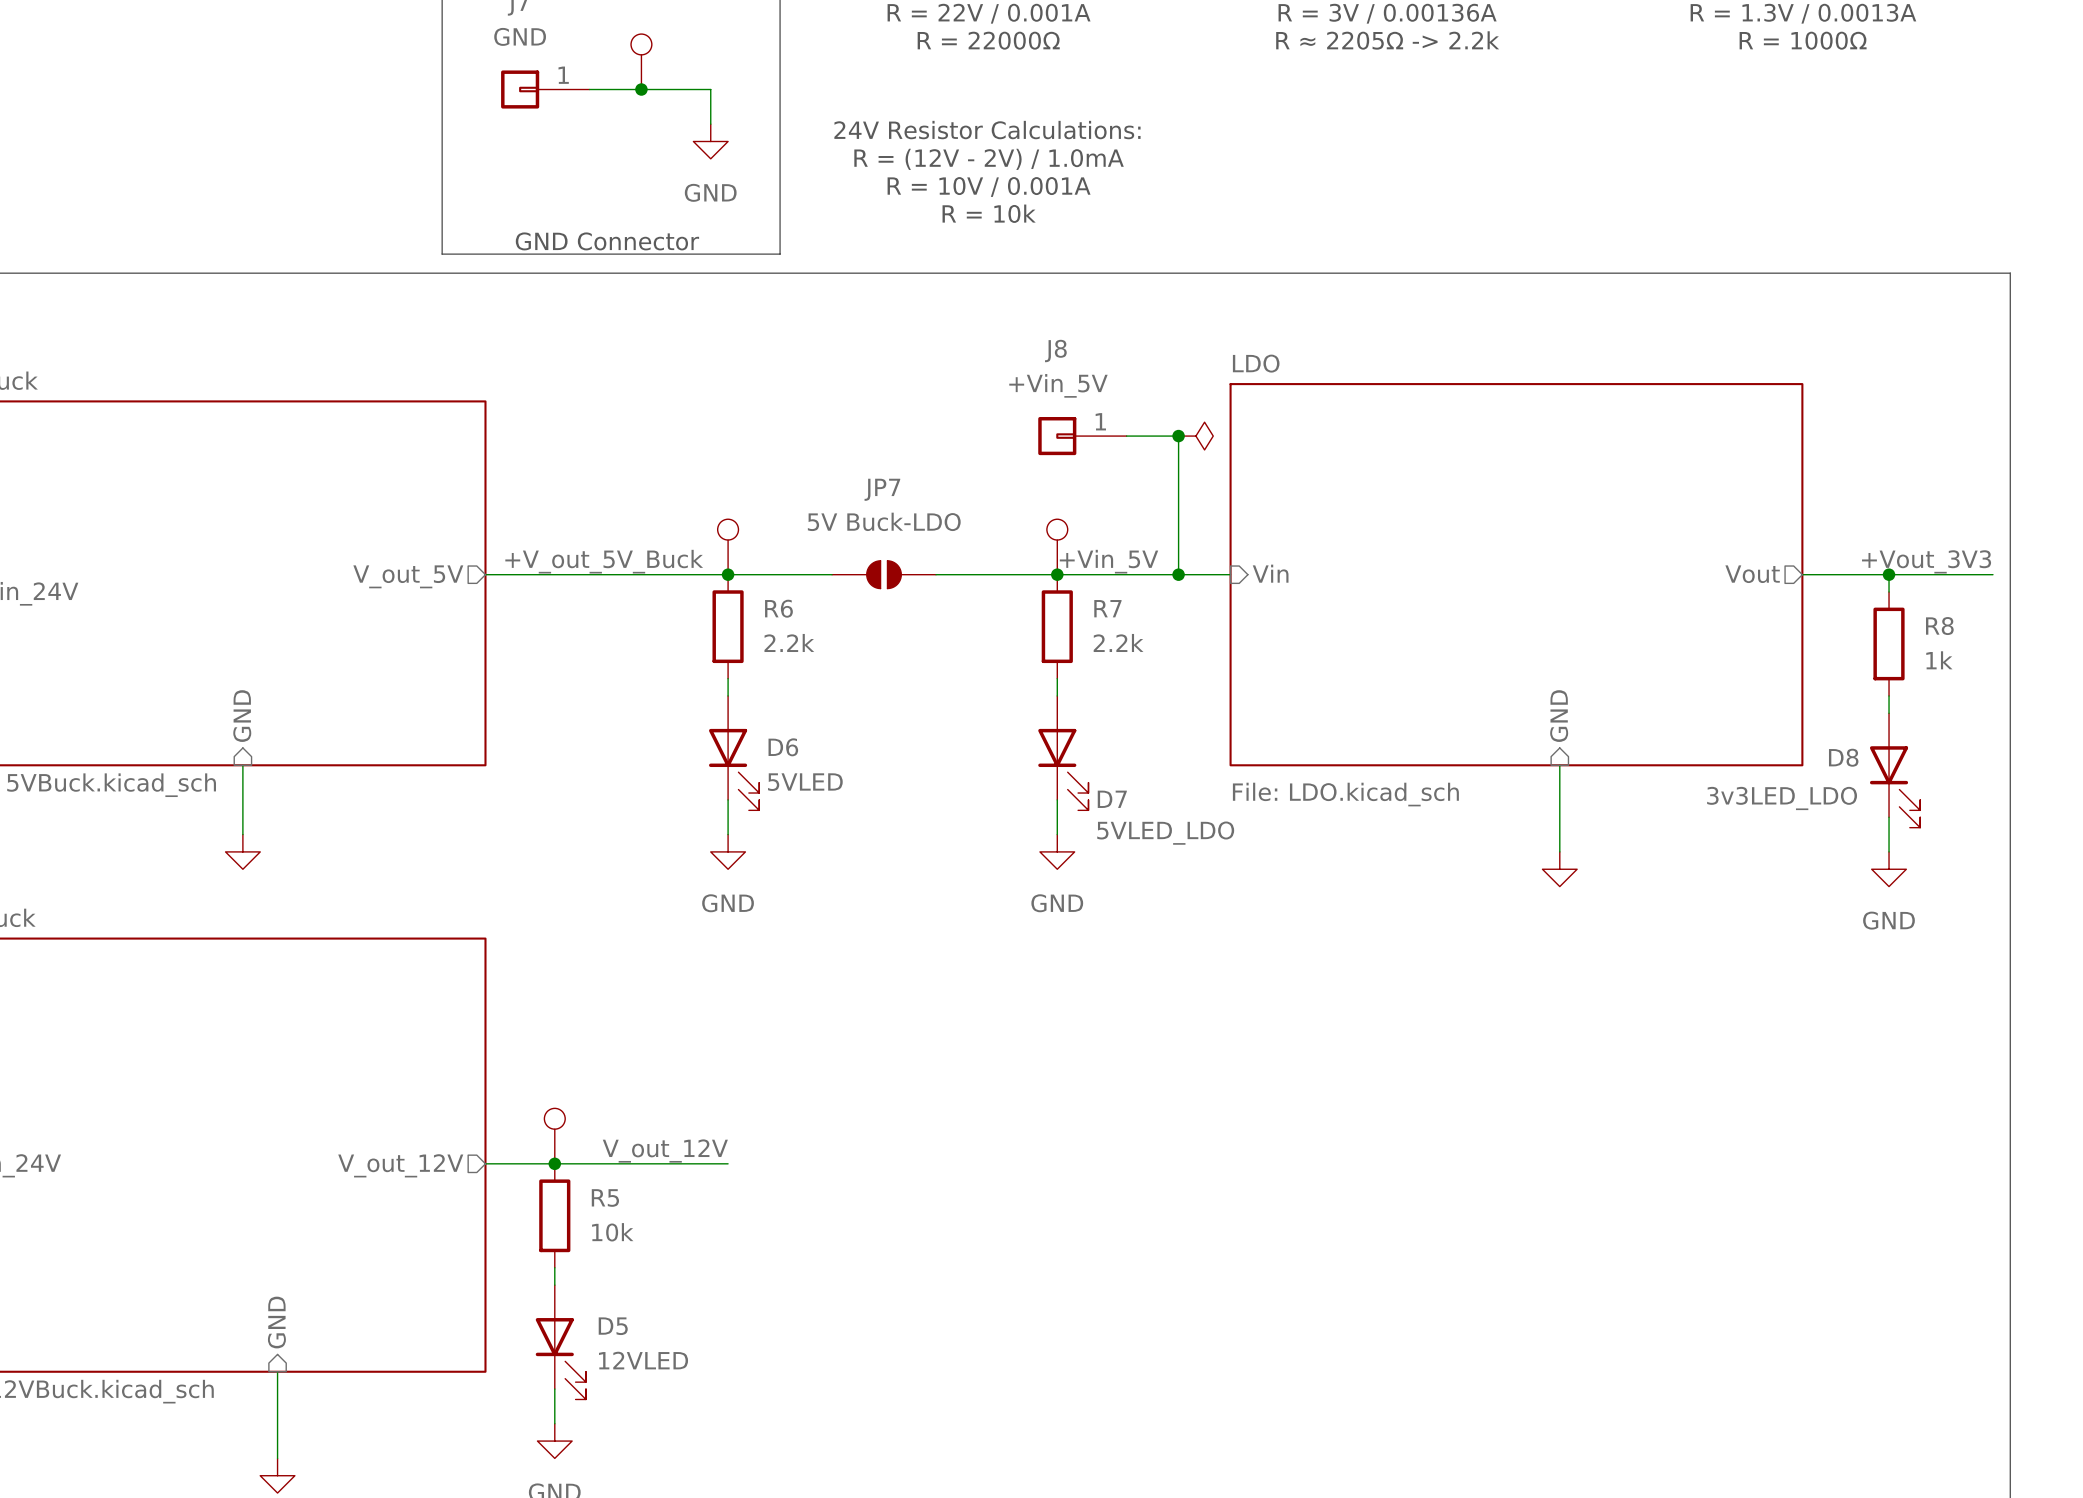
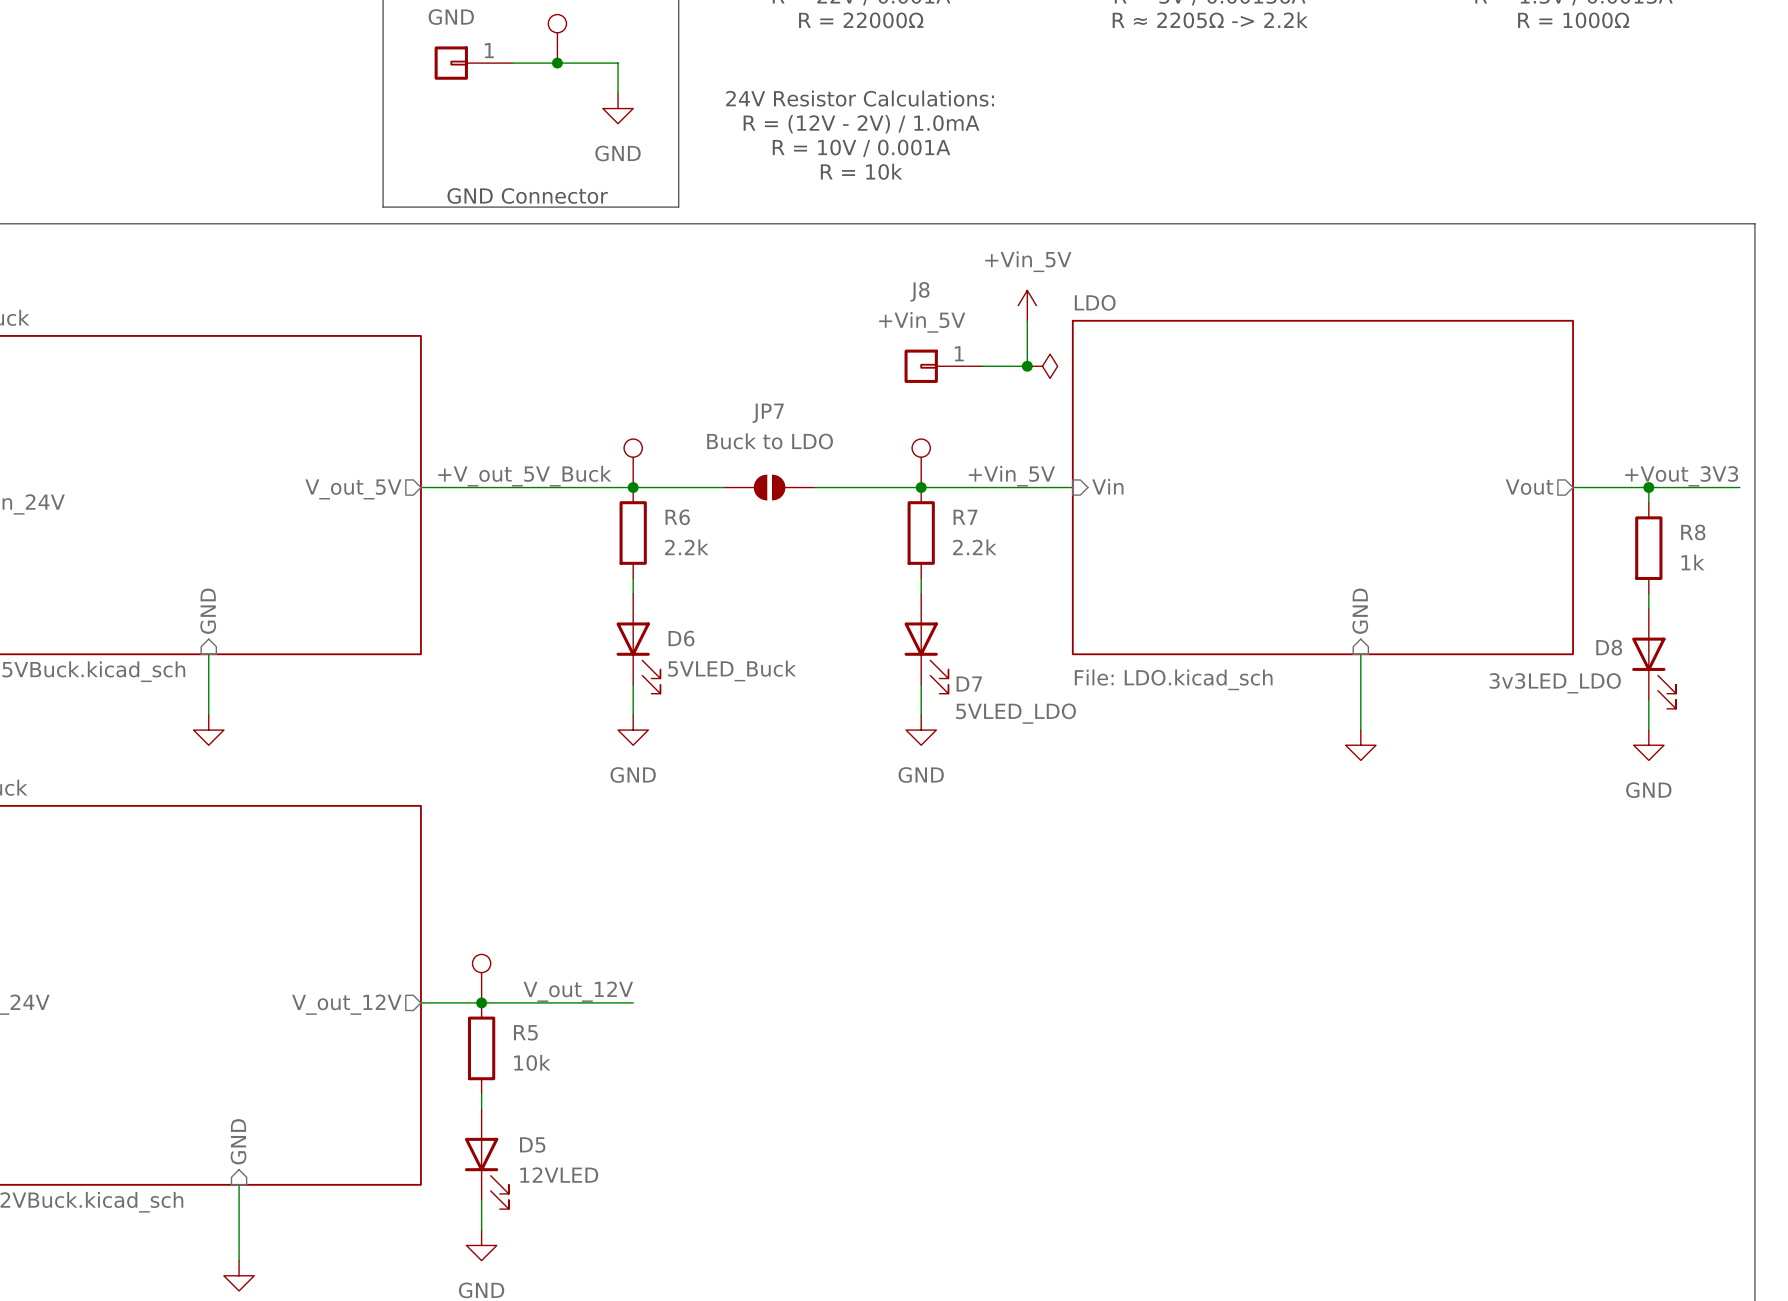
power symbol: none -> +Vin_5V (1027, 305)
wire: (1178, 436) (1178, 574) -> (1027, 366) (1027, 320)
JP7 value: 5V Buck-LDO (884, 521) -> Buck to LDO (770, 441)
label position: +Vin_5V (1109, 561) -> +Vin_5V (1011, 476)
junction: (1178, 574) -> none
D6 value: 5VLED (805, 782) -> 5VLED_Buck (732, 671)

